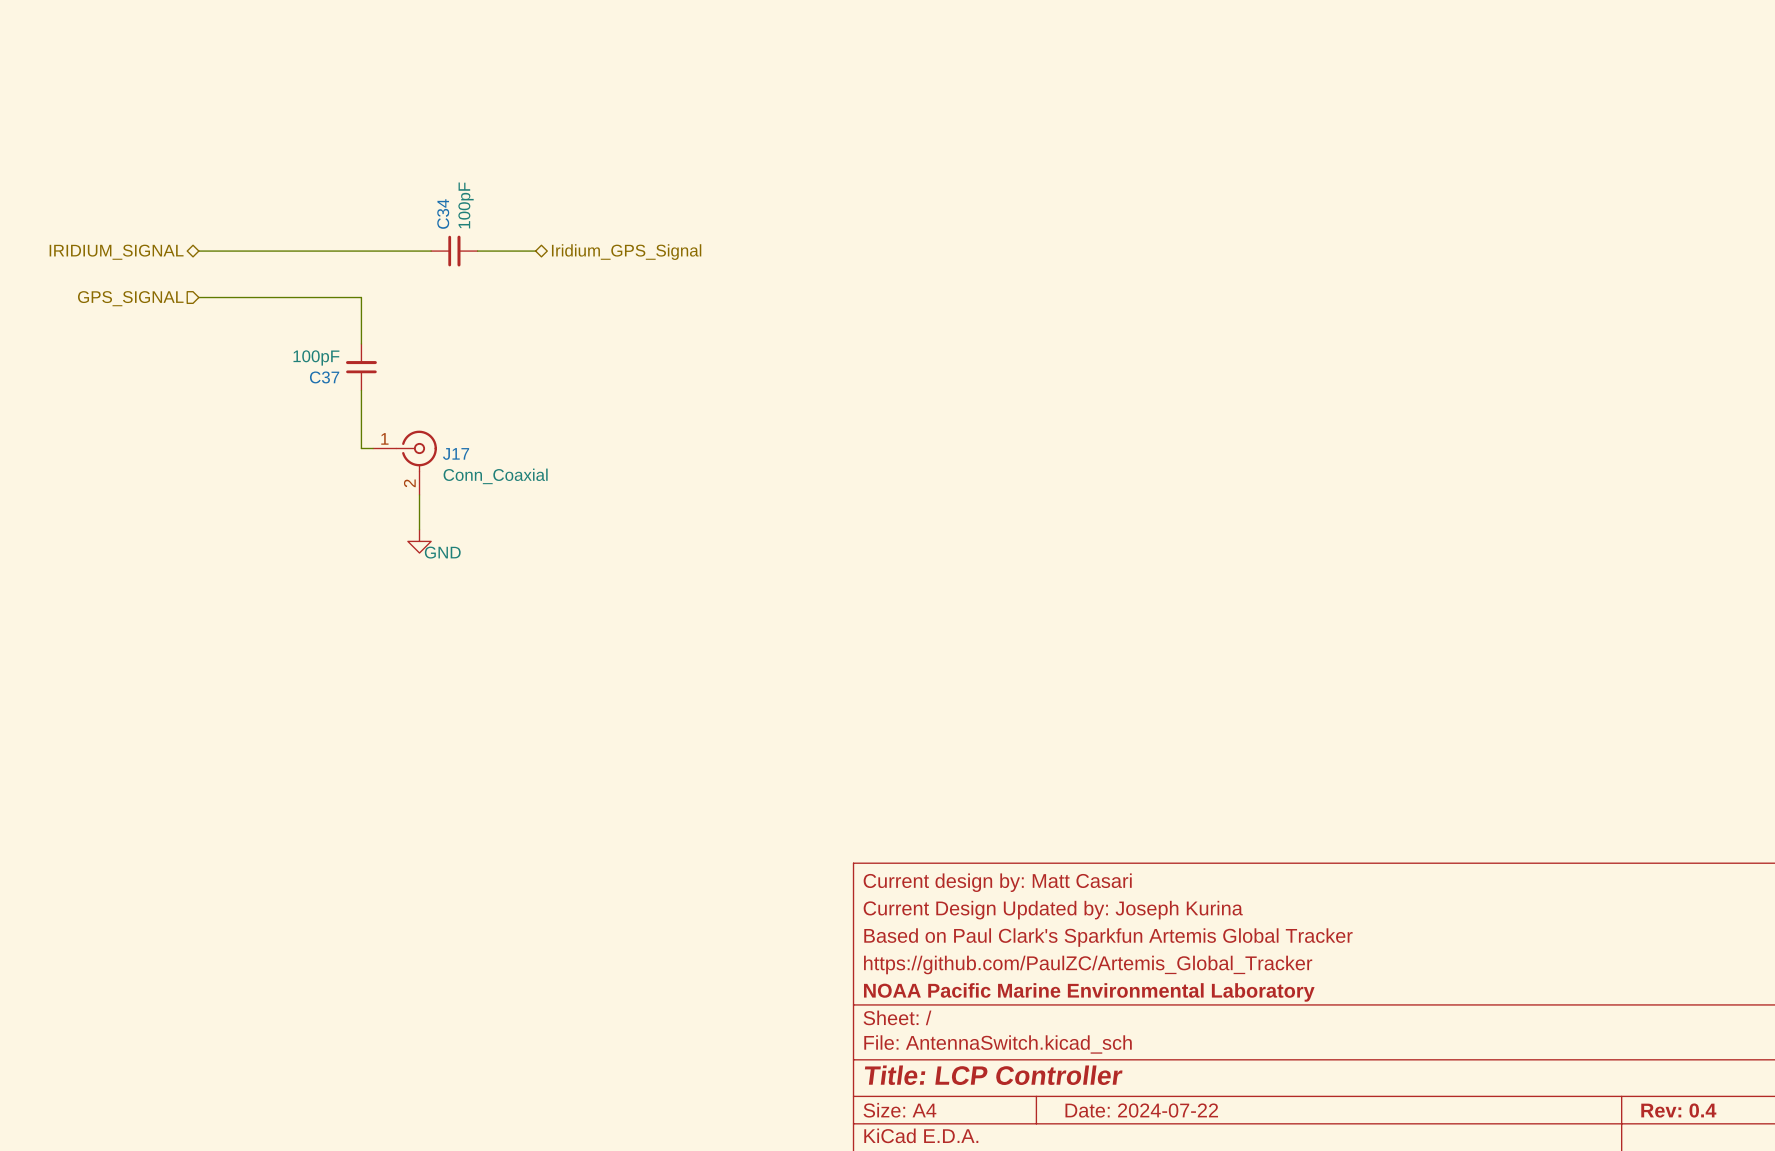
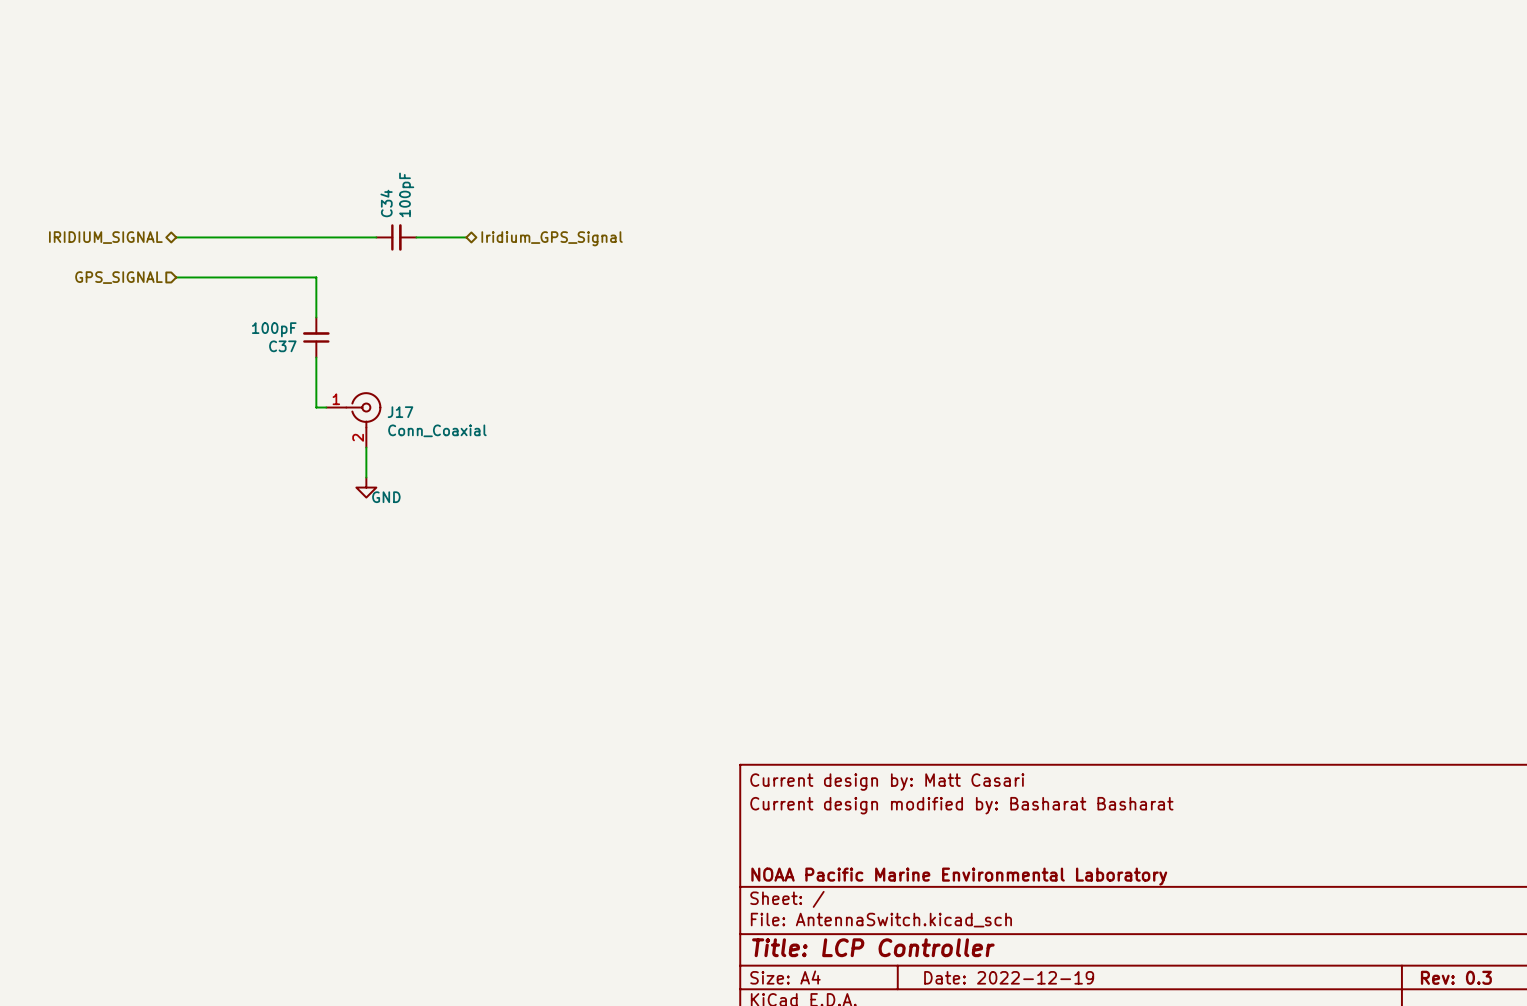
title block: Current Design Updated by: Joseph Kurina (1053, 910) -> Current design modified by: Basharat Basharat (961, 805)
title block: Based on Paul Clark's Sparkfun Artemis Global Tracker (1108, 937) -> none
title block: https://github.com/PaulZC/Artemis_Global_Tracker (1088, 964) -> none
title block: Date: 2024-07-22 (1141, 1110) -> Date: 2022-12-19 (1009, 977)
title block: Rev: 0.4 (1678, 1110) -> Rev: 0.3 (1456, 977)

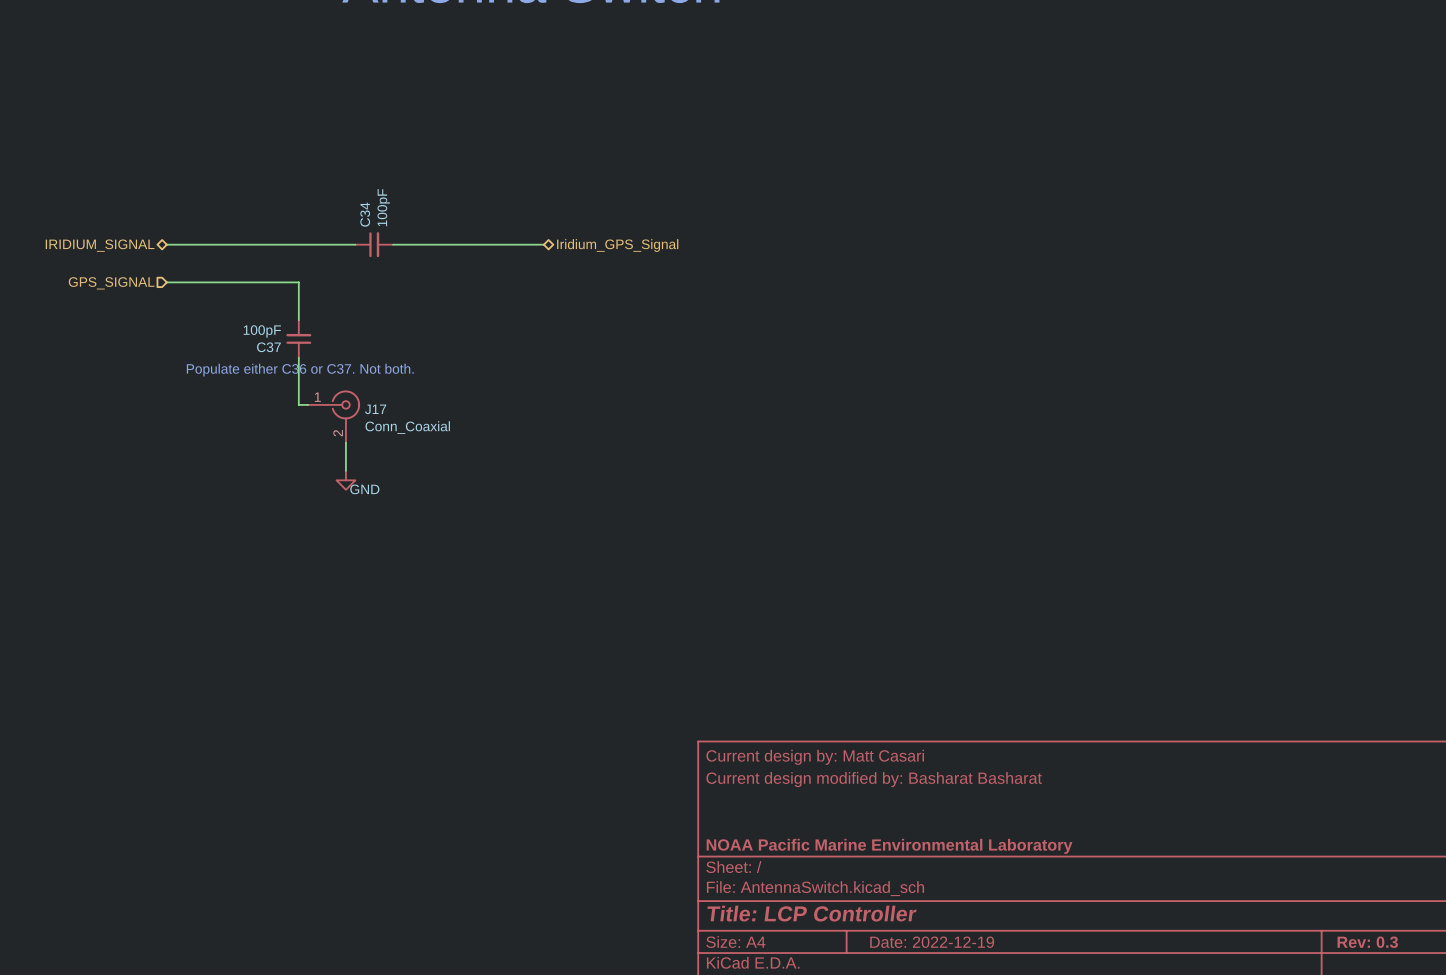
wire: none -> (440, 244) (543, 244)
hierarchical label position: Iridium_GPS_Signal (552, 238) -> Iridium_GPS_Signal (617, 245)
text: none -> Populate either C36 or C37. Not both. (300, 370)

